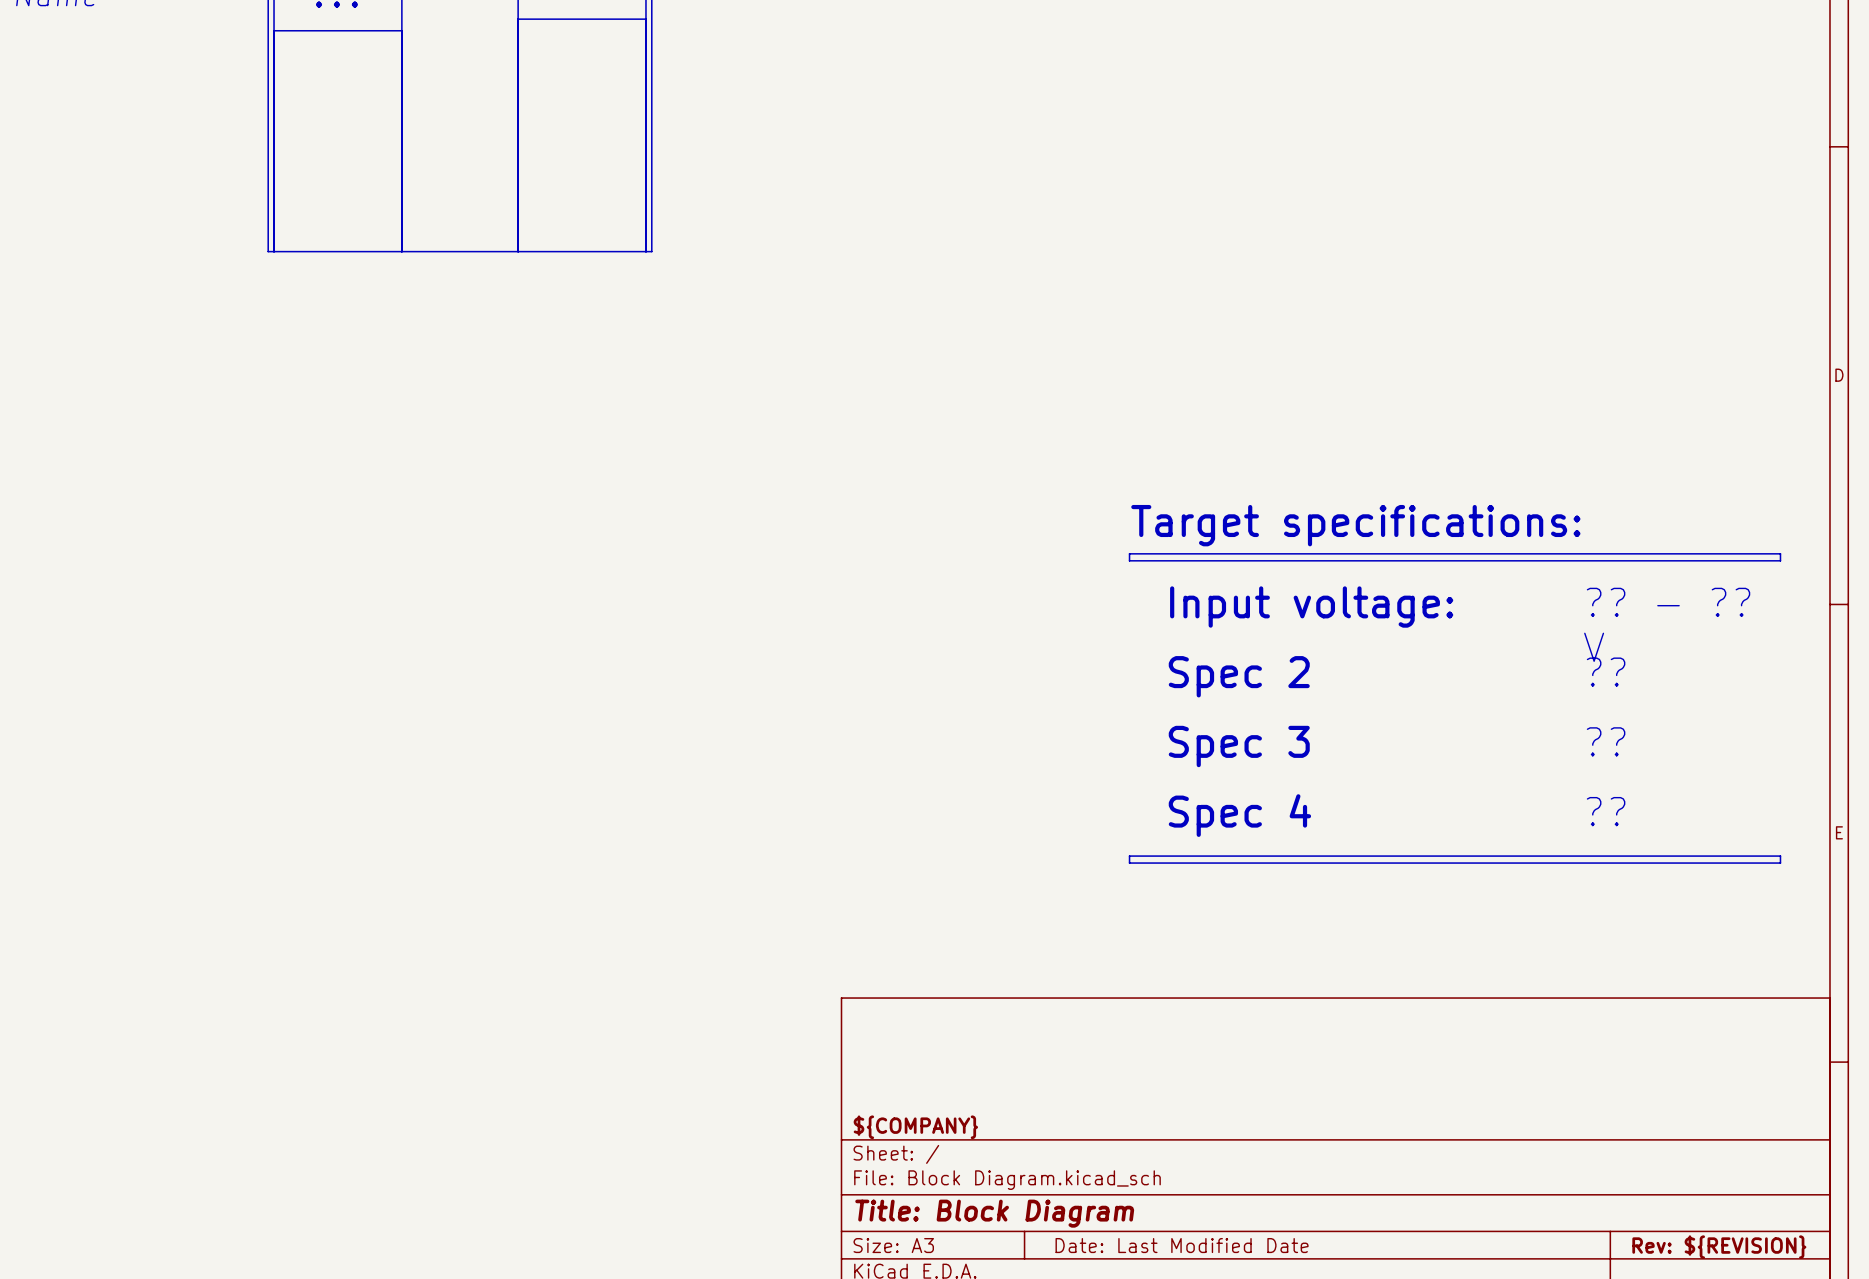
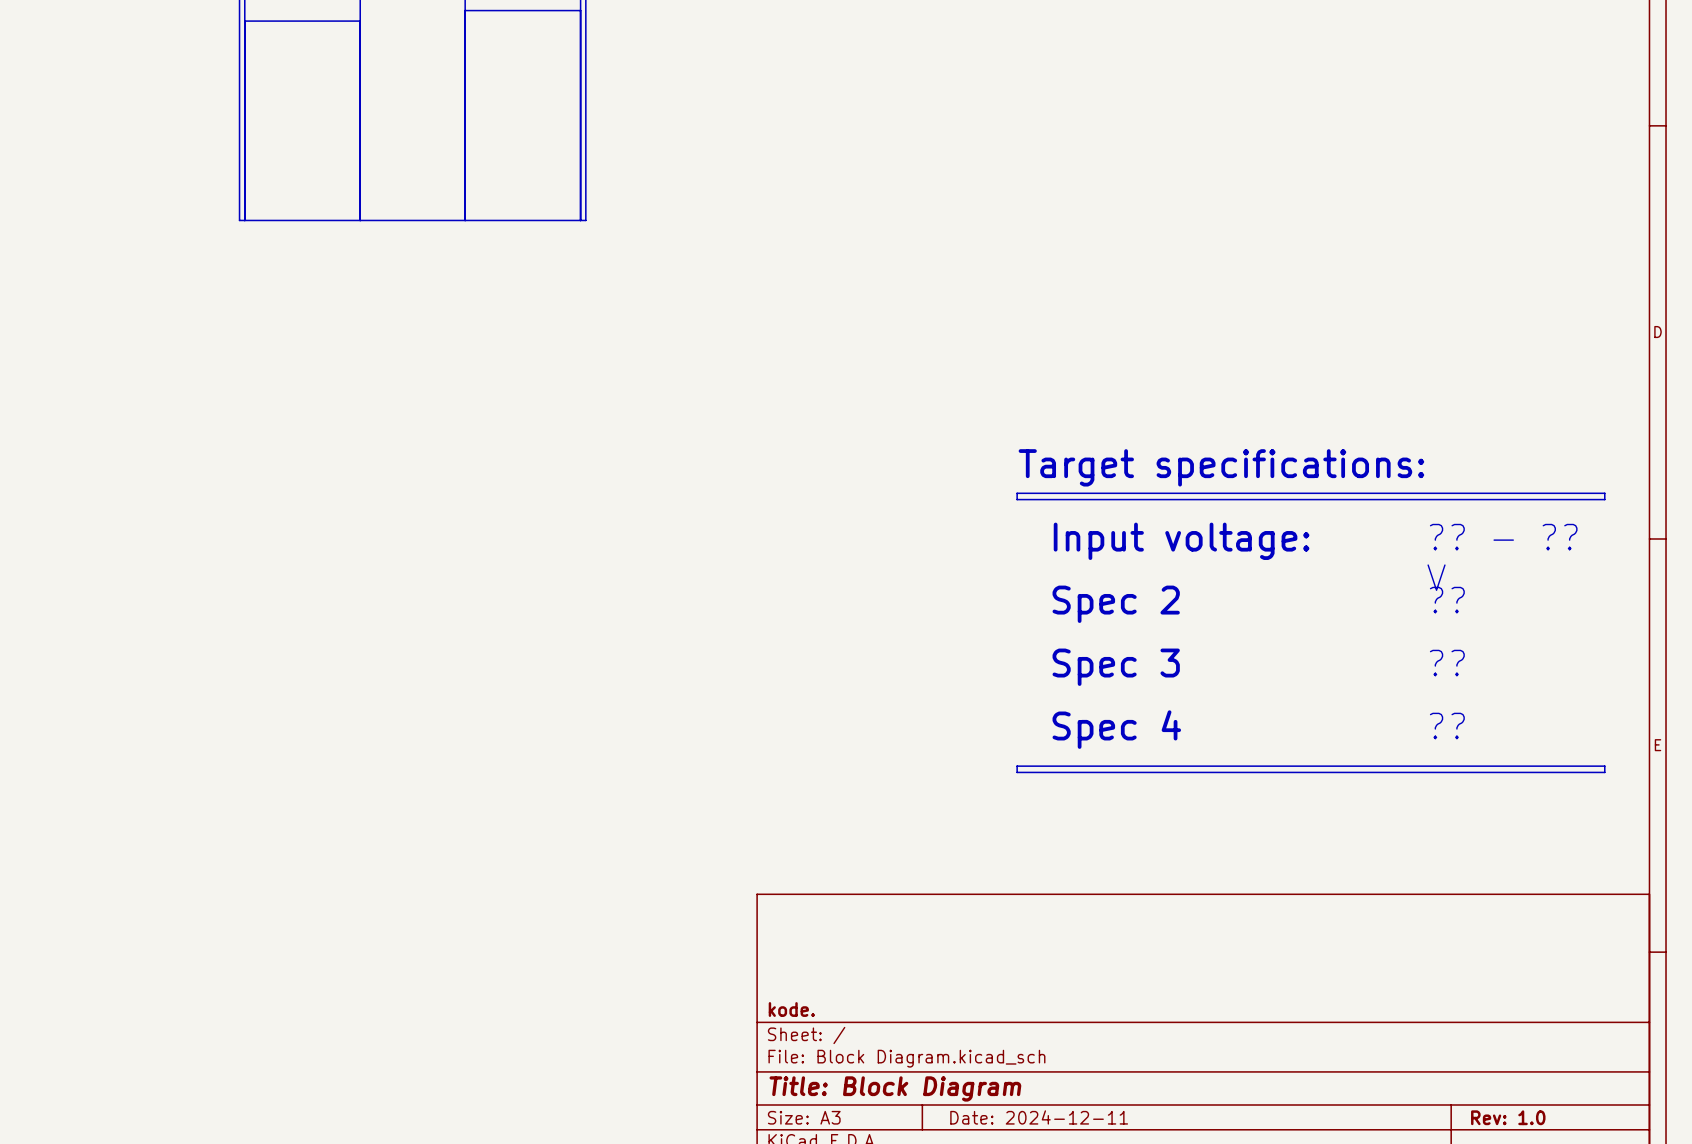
title block: ${COMPANY} (915, 1127) -> kode. (791, 1009)
title block: Date: Last Modified Date (1182, 1245) -> Date: 2024-12-11 (1039, 1117)
title block: Rev: ${REVISION} (1719, 1247) -> Rev: 1.0 (1508, 1117)

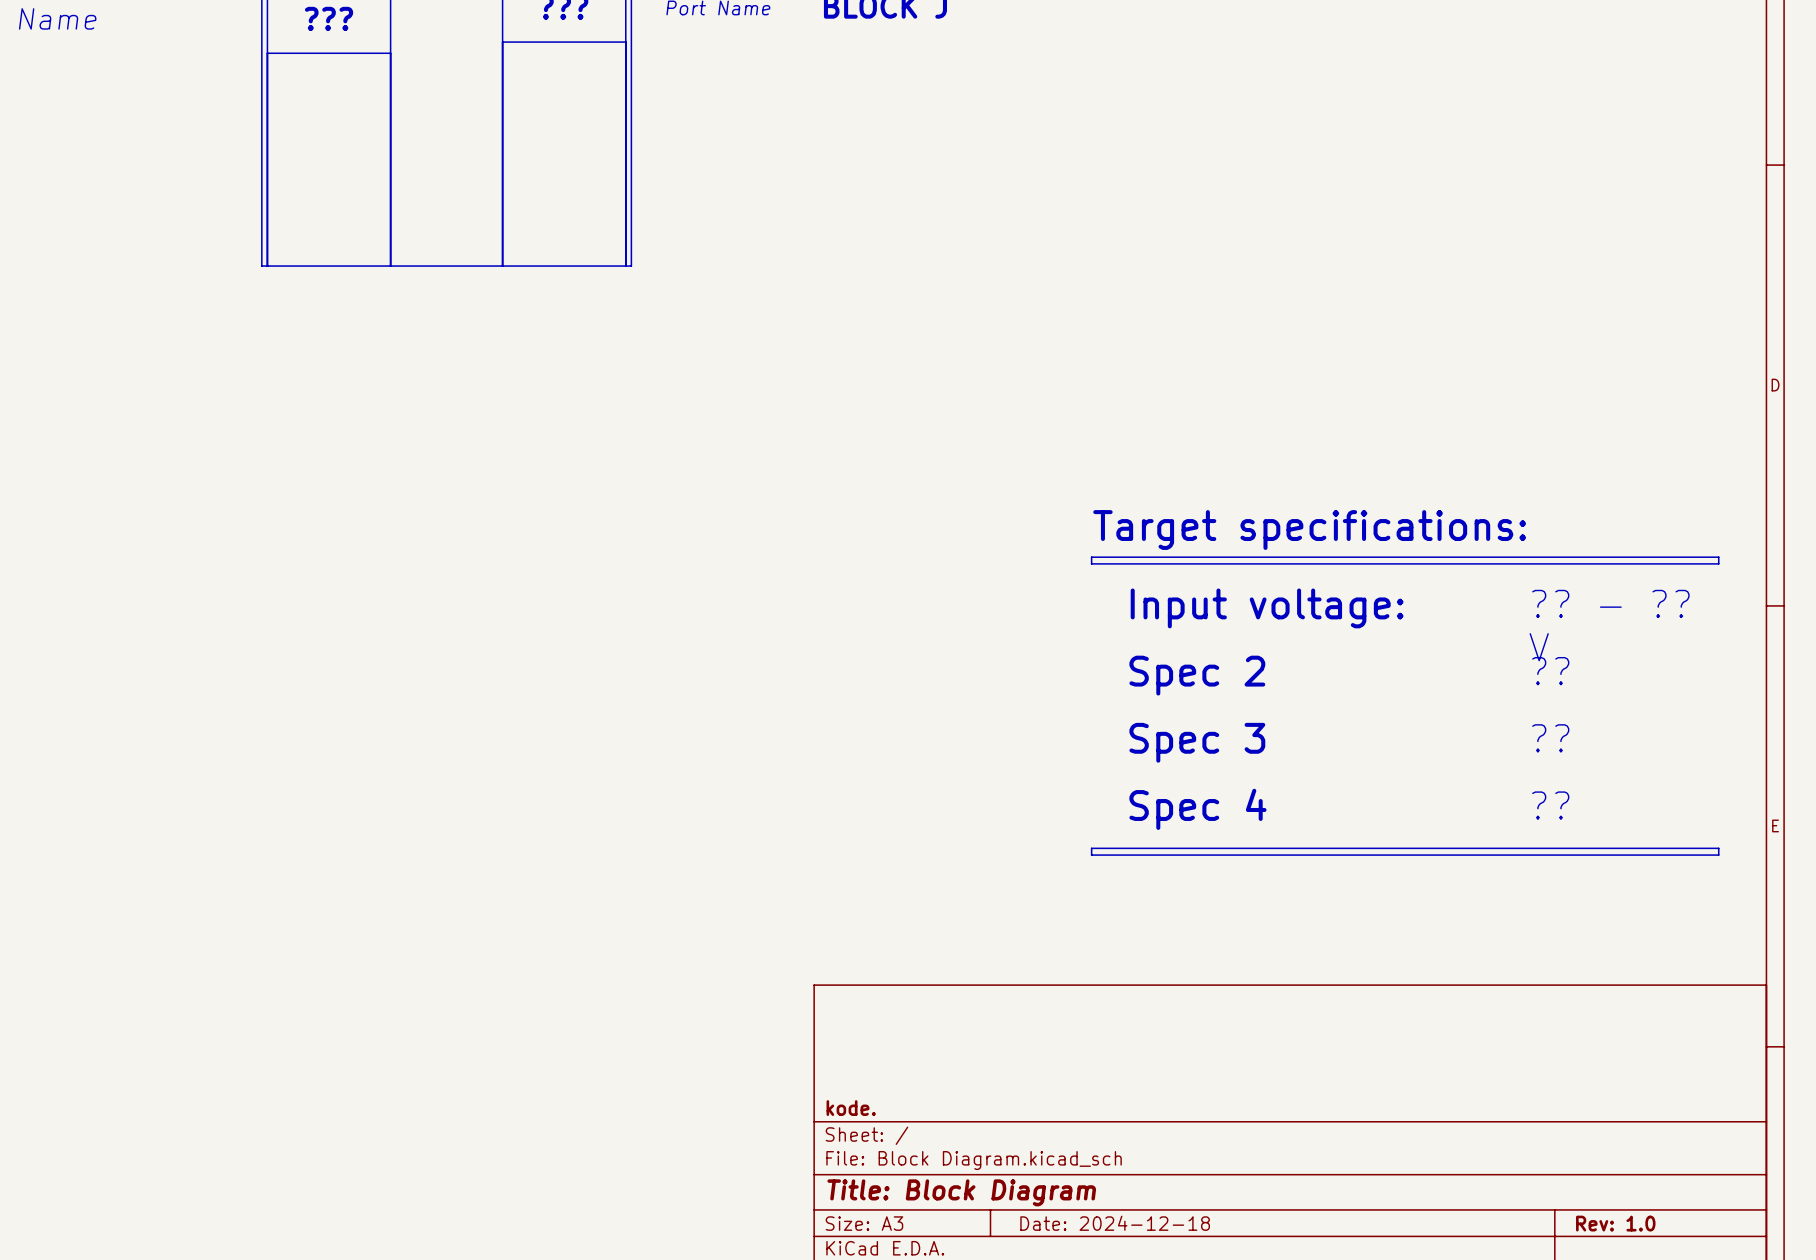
title block: Date: 2024-12-11 (1039, 1117) -> Date: 2024-12-18 (1115, 1223)

